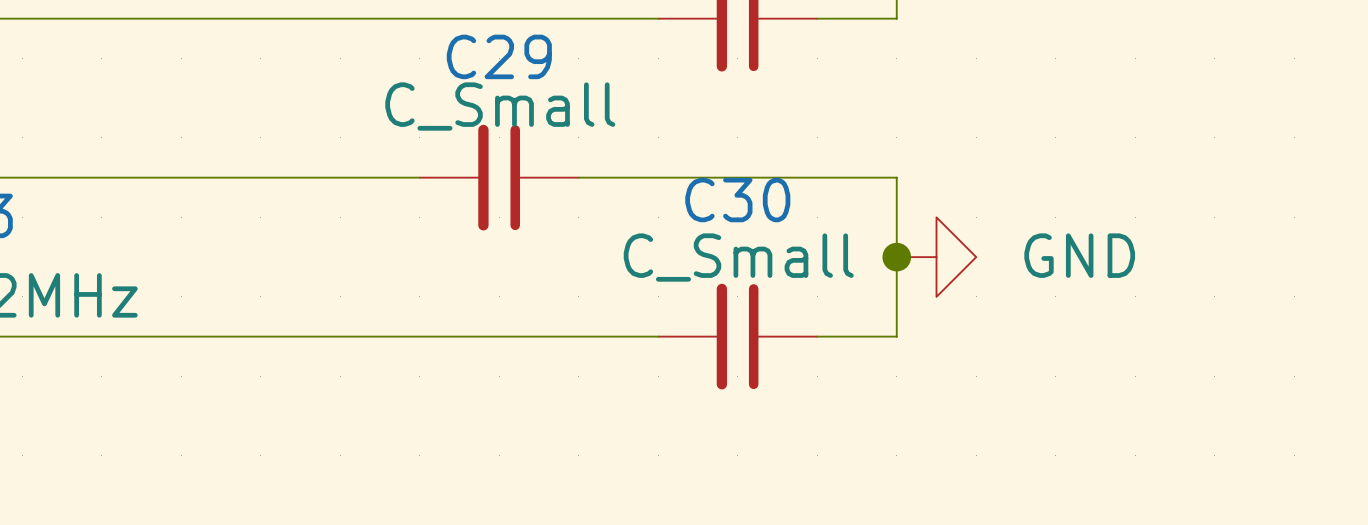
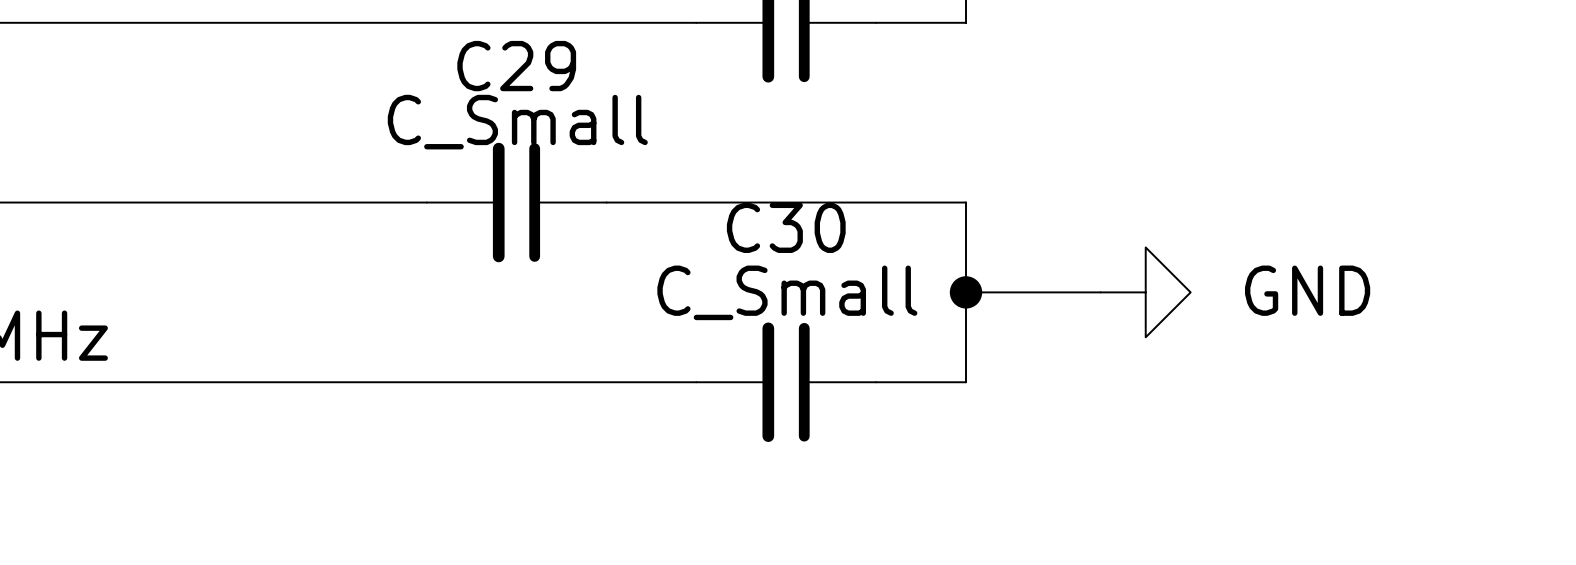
wire: none -> (966, 292) (1100, 292)
power symbol position: GND (936, 257) -> GND (1145, 292)

